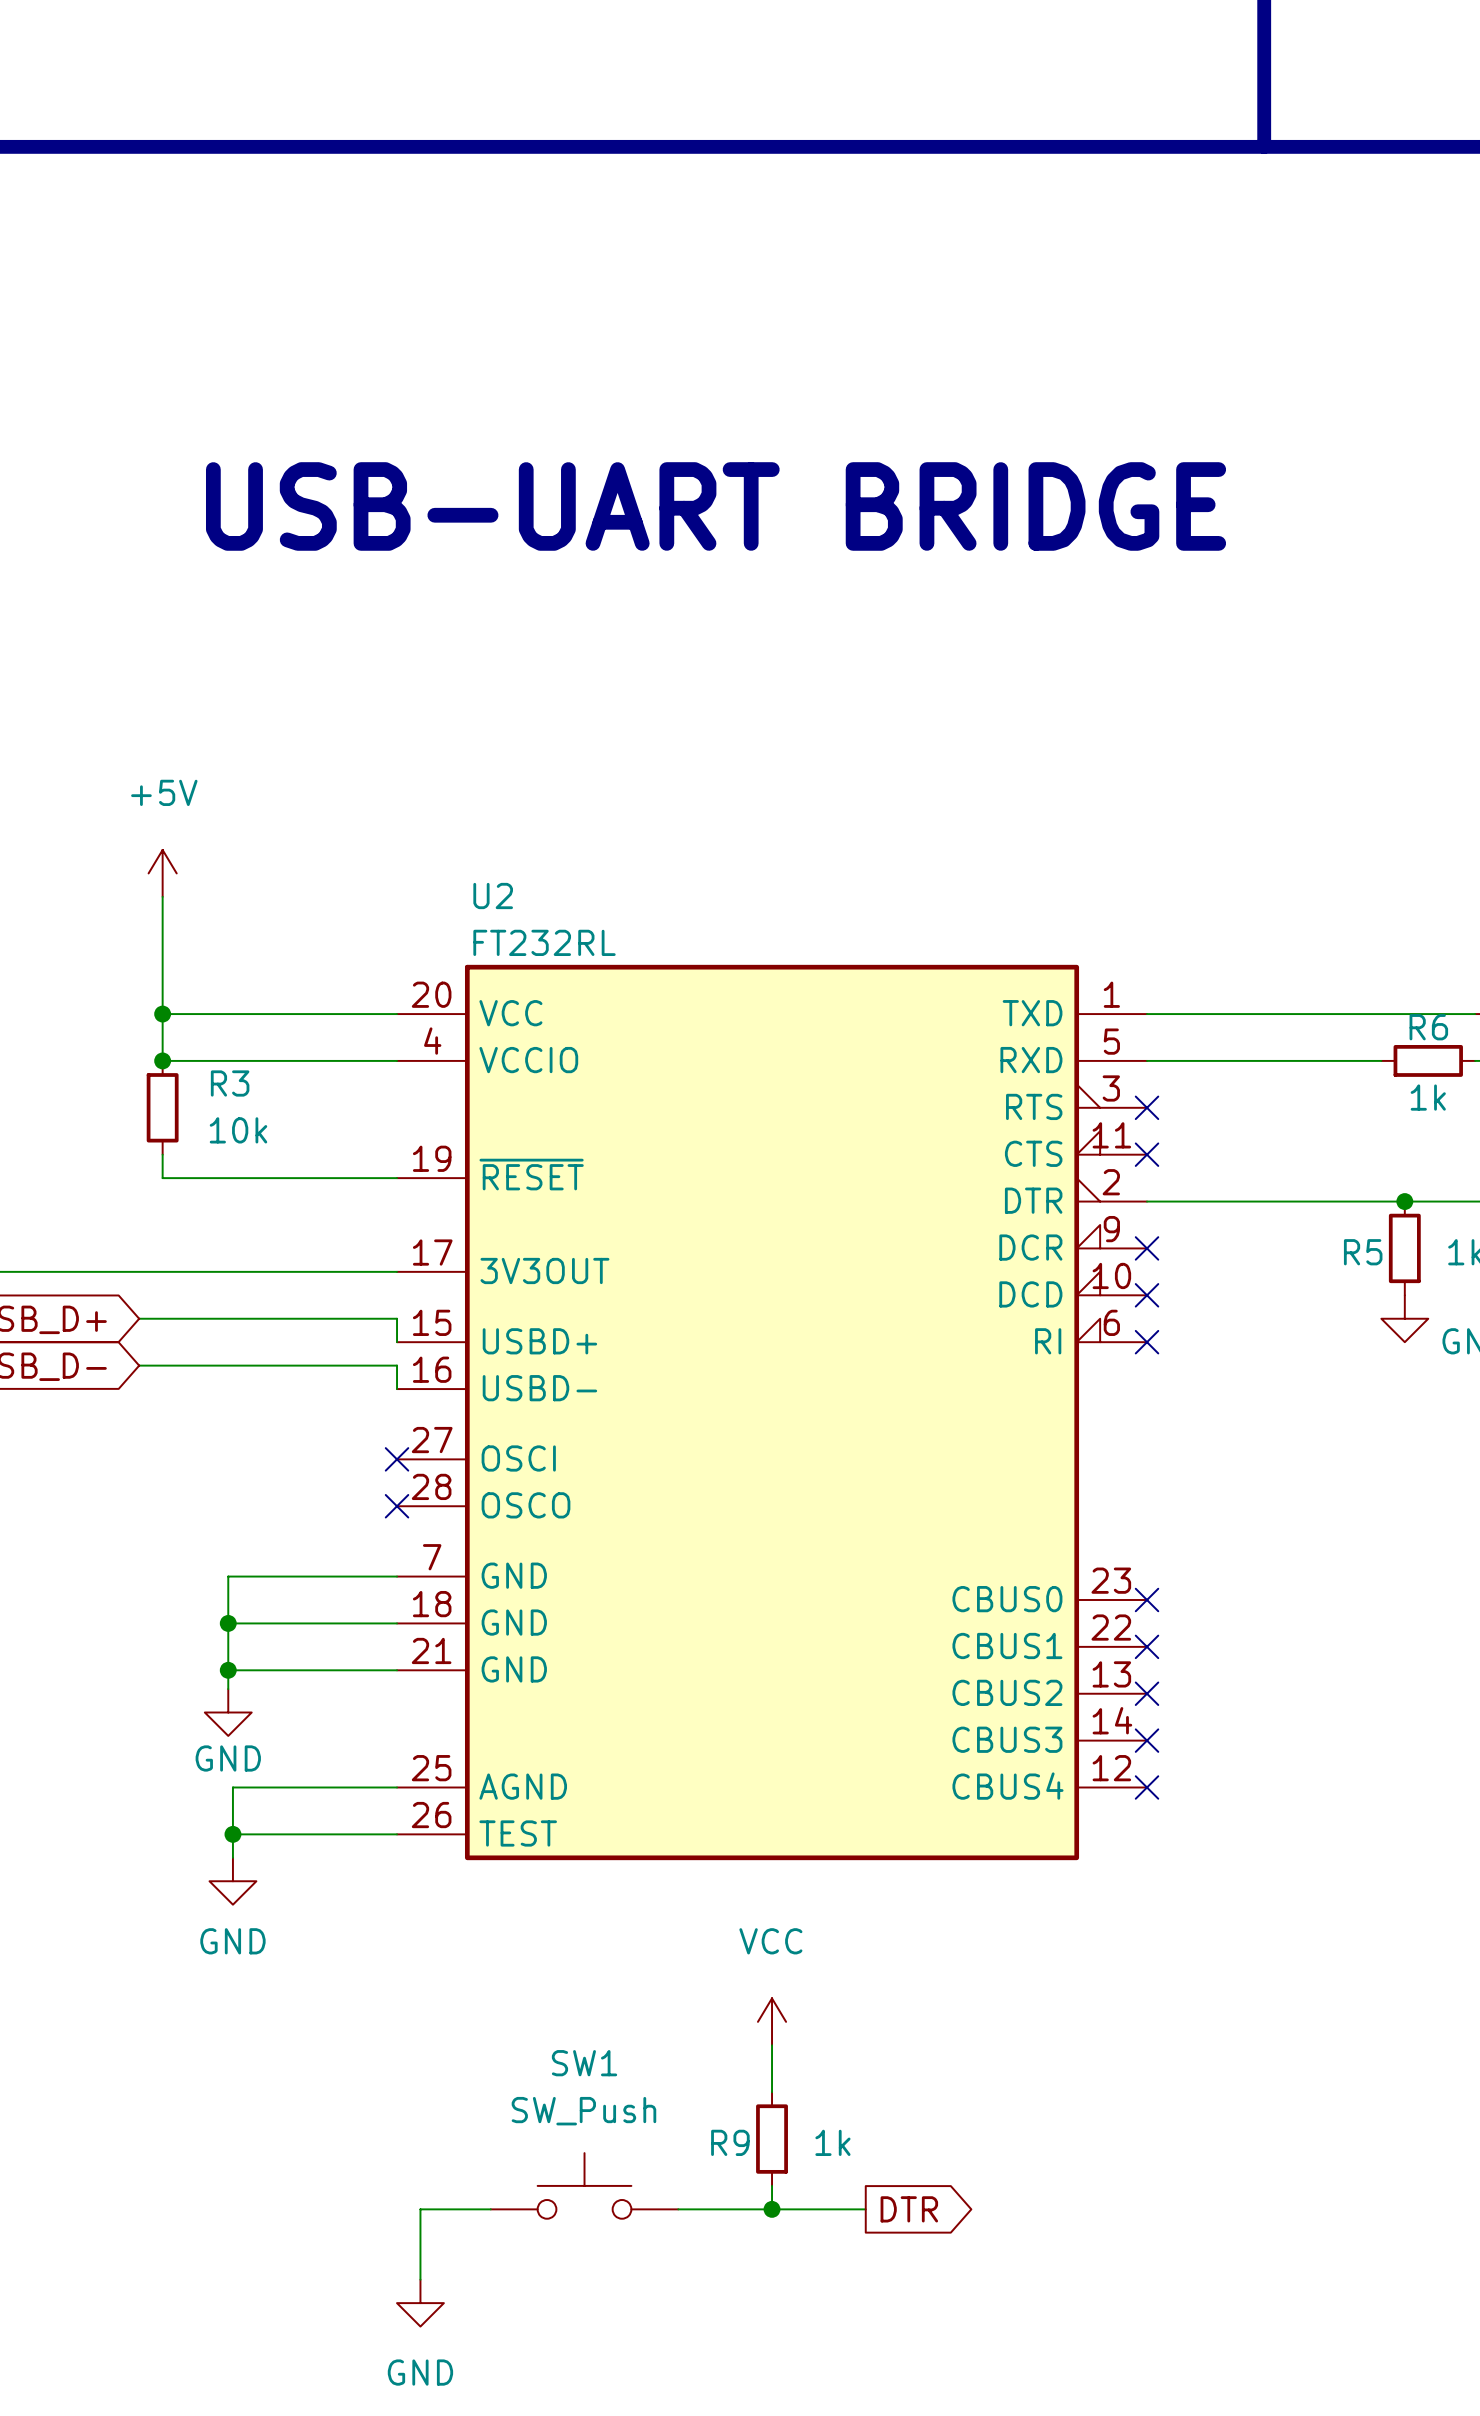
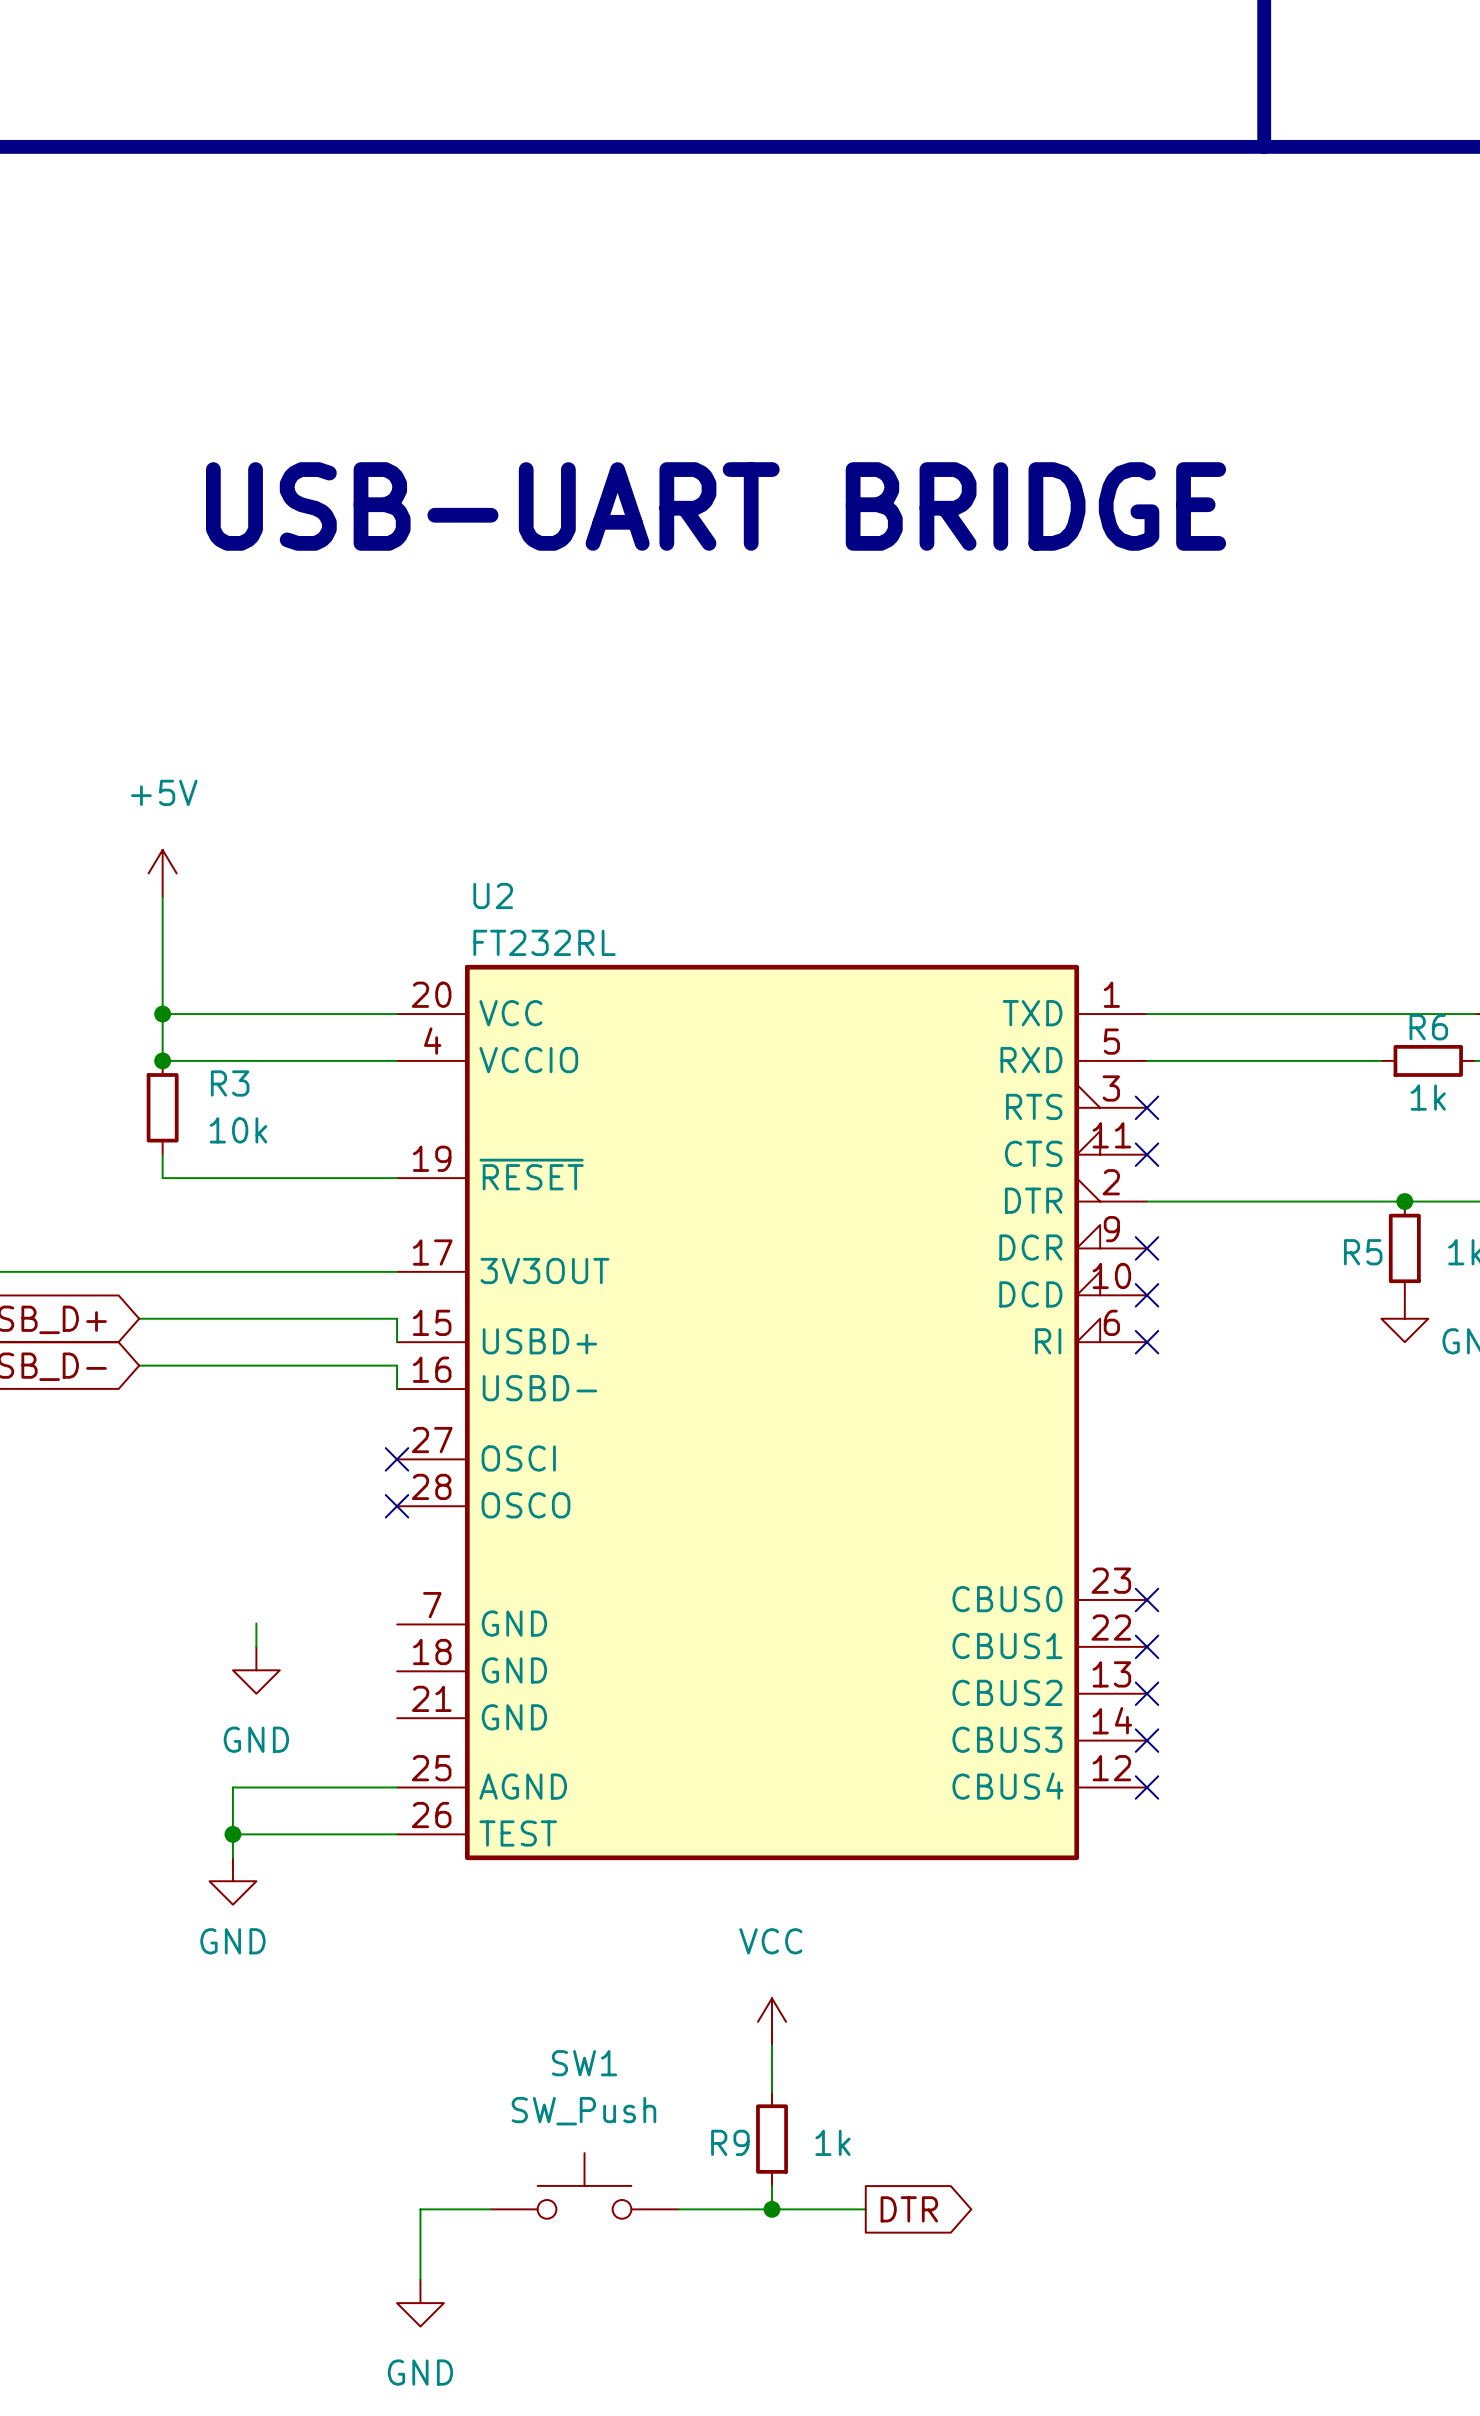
U2 symbol: [397, 964, 1148, 1861] -> [397, 964, 1148, 1861]
wire: (397, 1576) (228, 1576) (228, 1689) -> none
wire: (228, 1623) (397, 1623) -> none
junction: (228, 1623) -> none
wire: none -> (256, 1623) (256, 1646)
wire: (228, 1670) (397, 1670) -> none
junction: (228, 1670) -> none
power symbol position: GND (228, 1712) -> GND (256, 1670)
power symbol text position: GND (228, 1758) -> GND (256, 1739)

